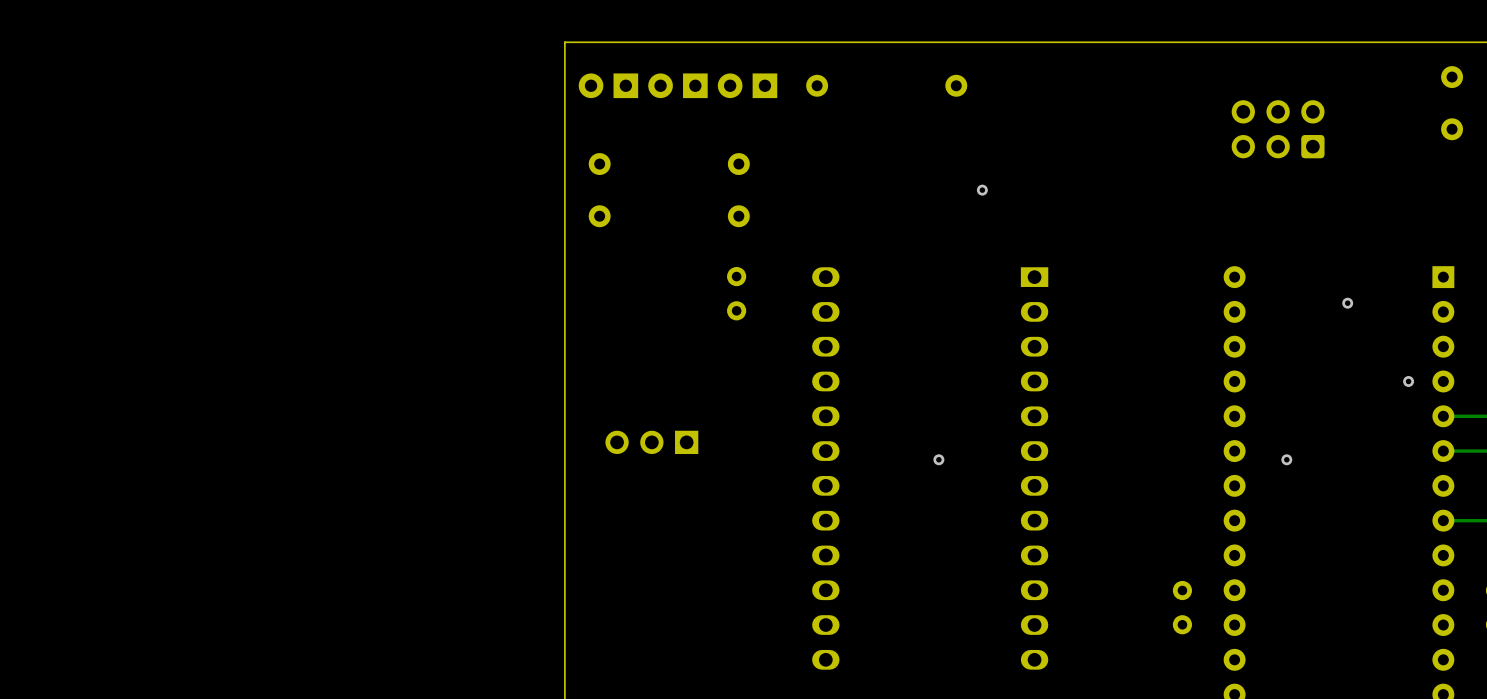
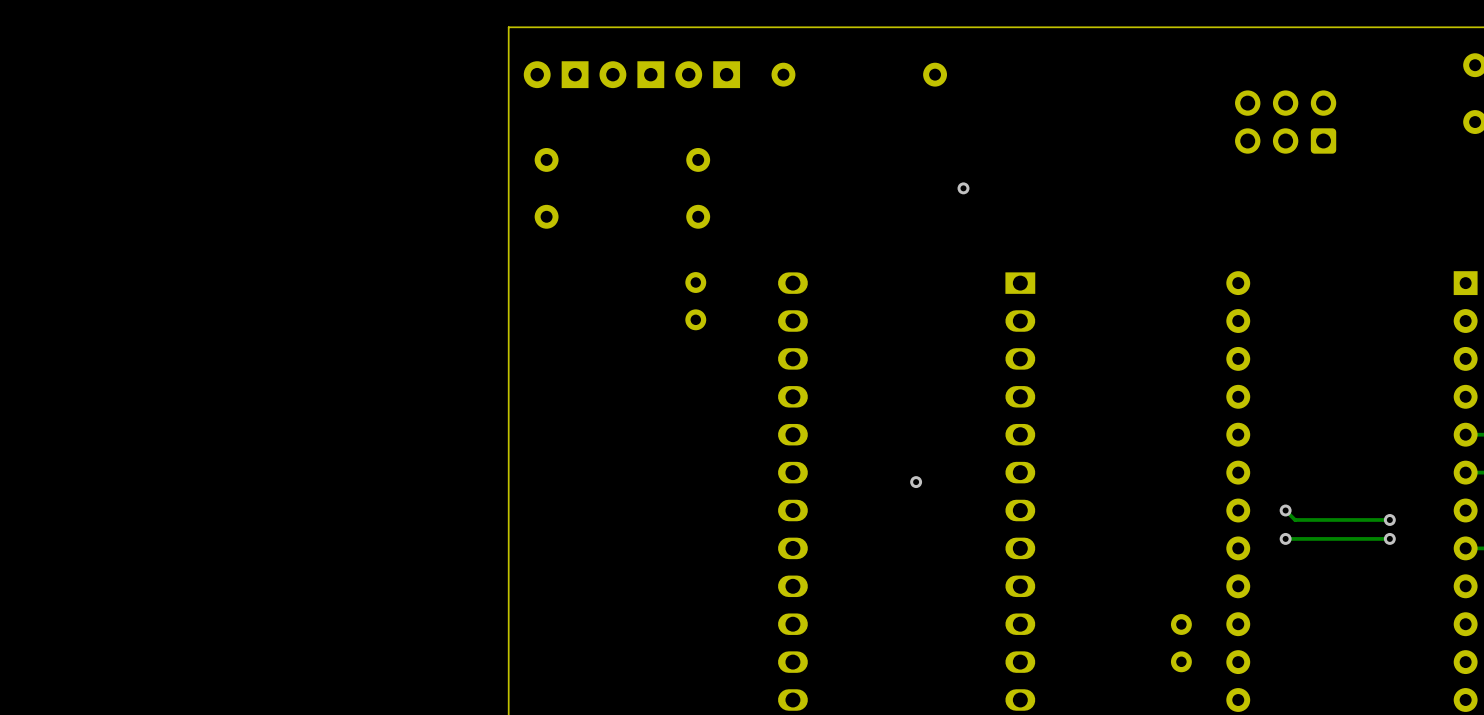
via: (1347, 303) -> none
via: (1408, 381) -> none
part: (651, 442) -> none
via: (1286, 459) -> none
track: none -> (1285, 510) (1295, 519) (1389, 519)
via: none -> (1285, 510)
via: none -> (1389, 519)
via: none -> (1285, 538)
track: none -> (1389, 538) (1285, 538)
via: none -> (1389, 538)

